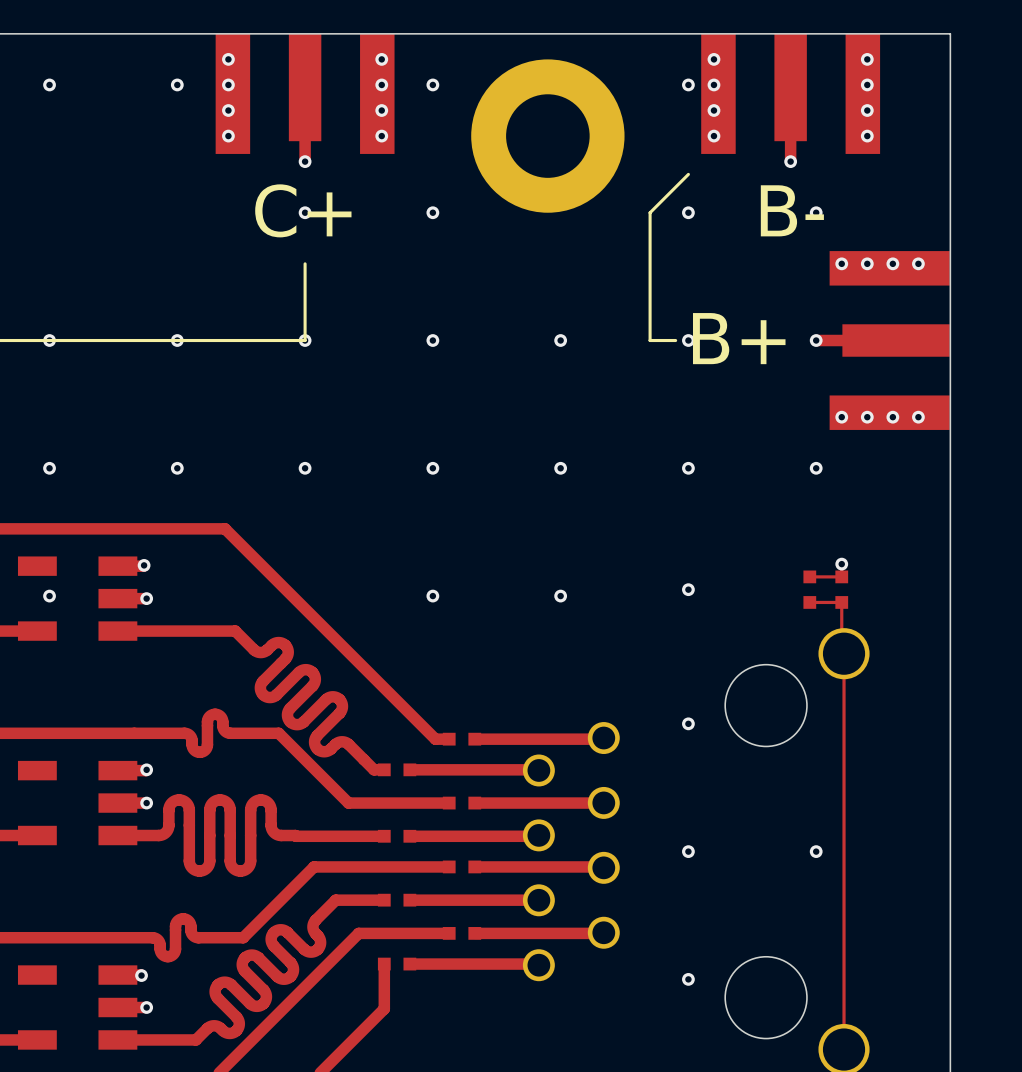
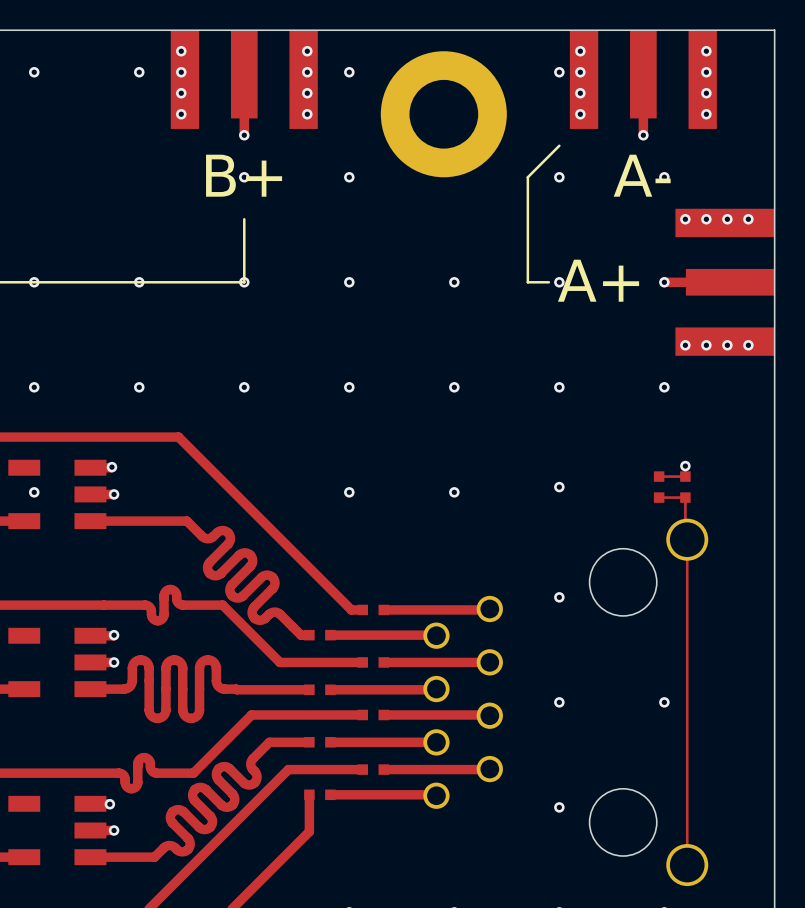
text: C+ (303, 210) -> B+ (244, 175)
text: B- (792, 210) -> A- (642, 175)
text: B+ (739, 338) -> A+ (598, 280)

